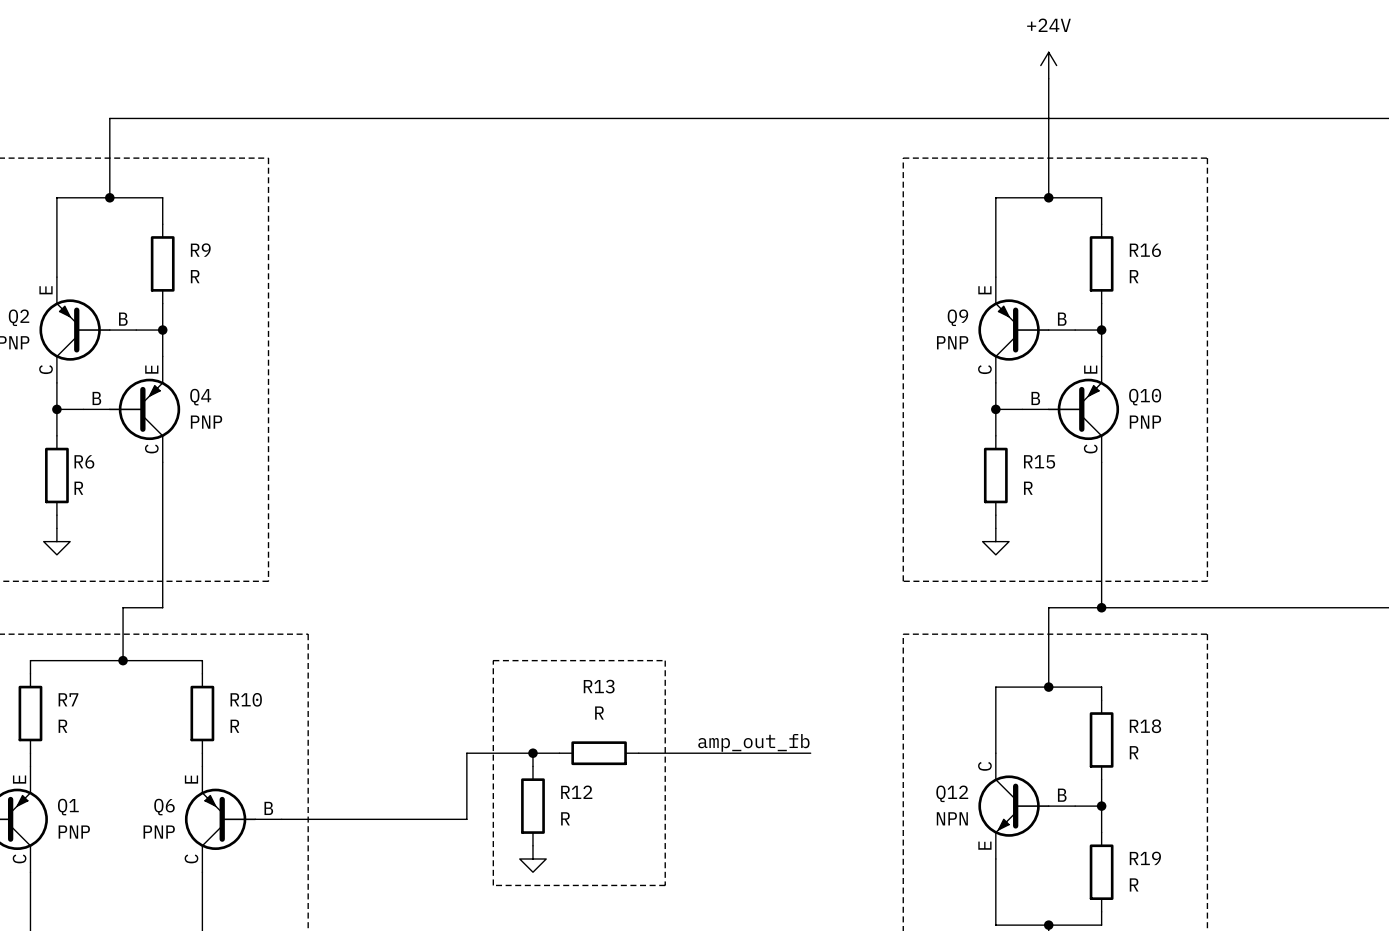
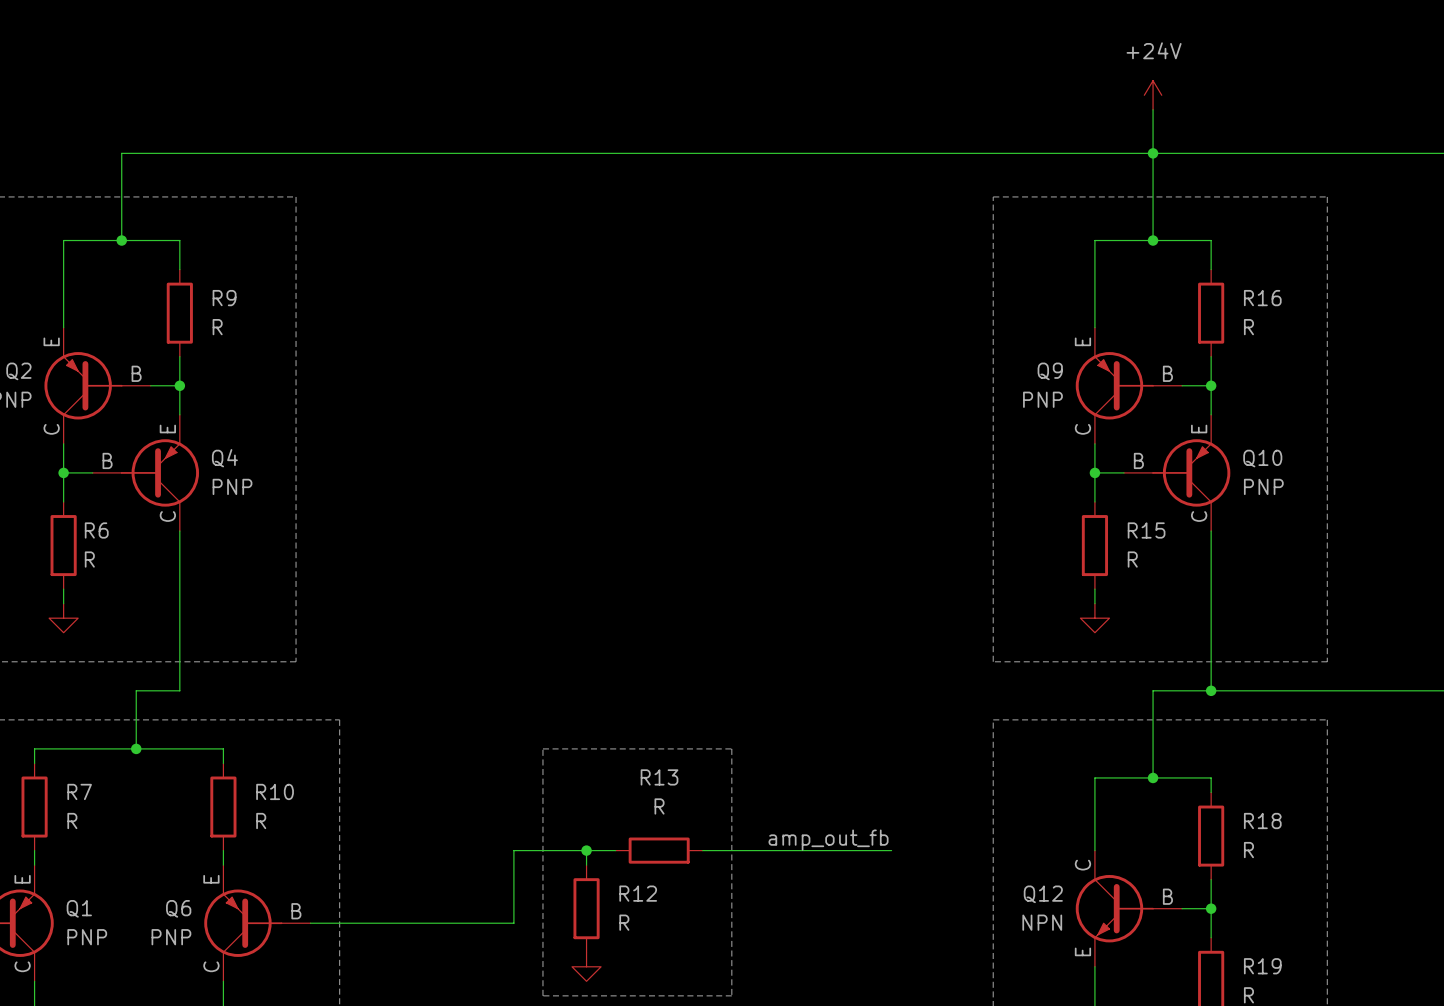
junction: none -> (1153, 153)

